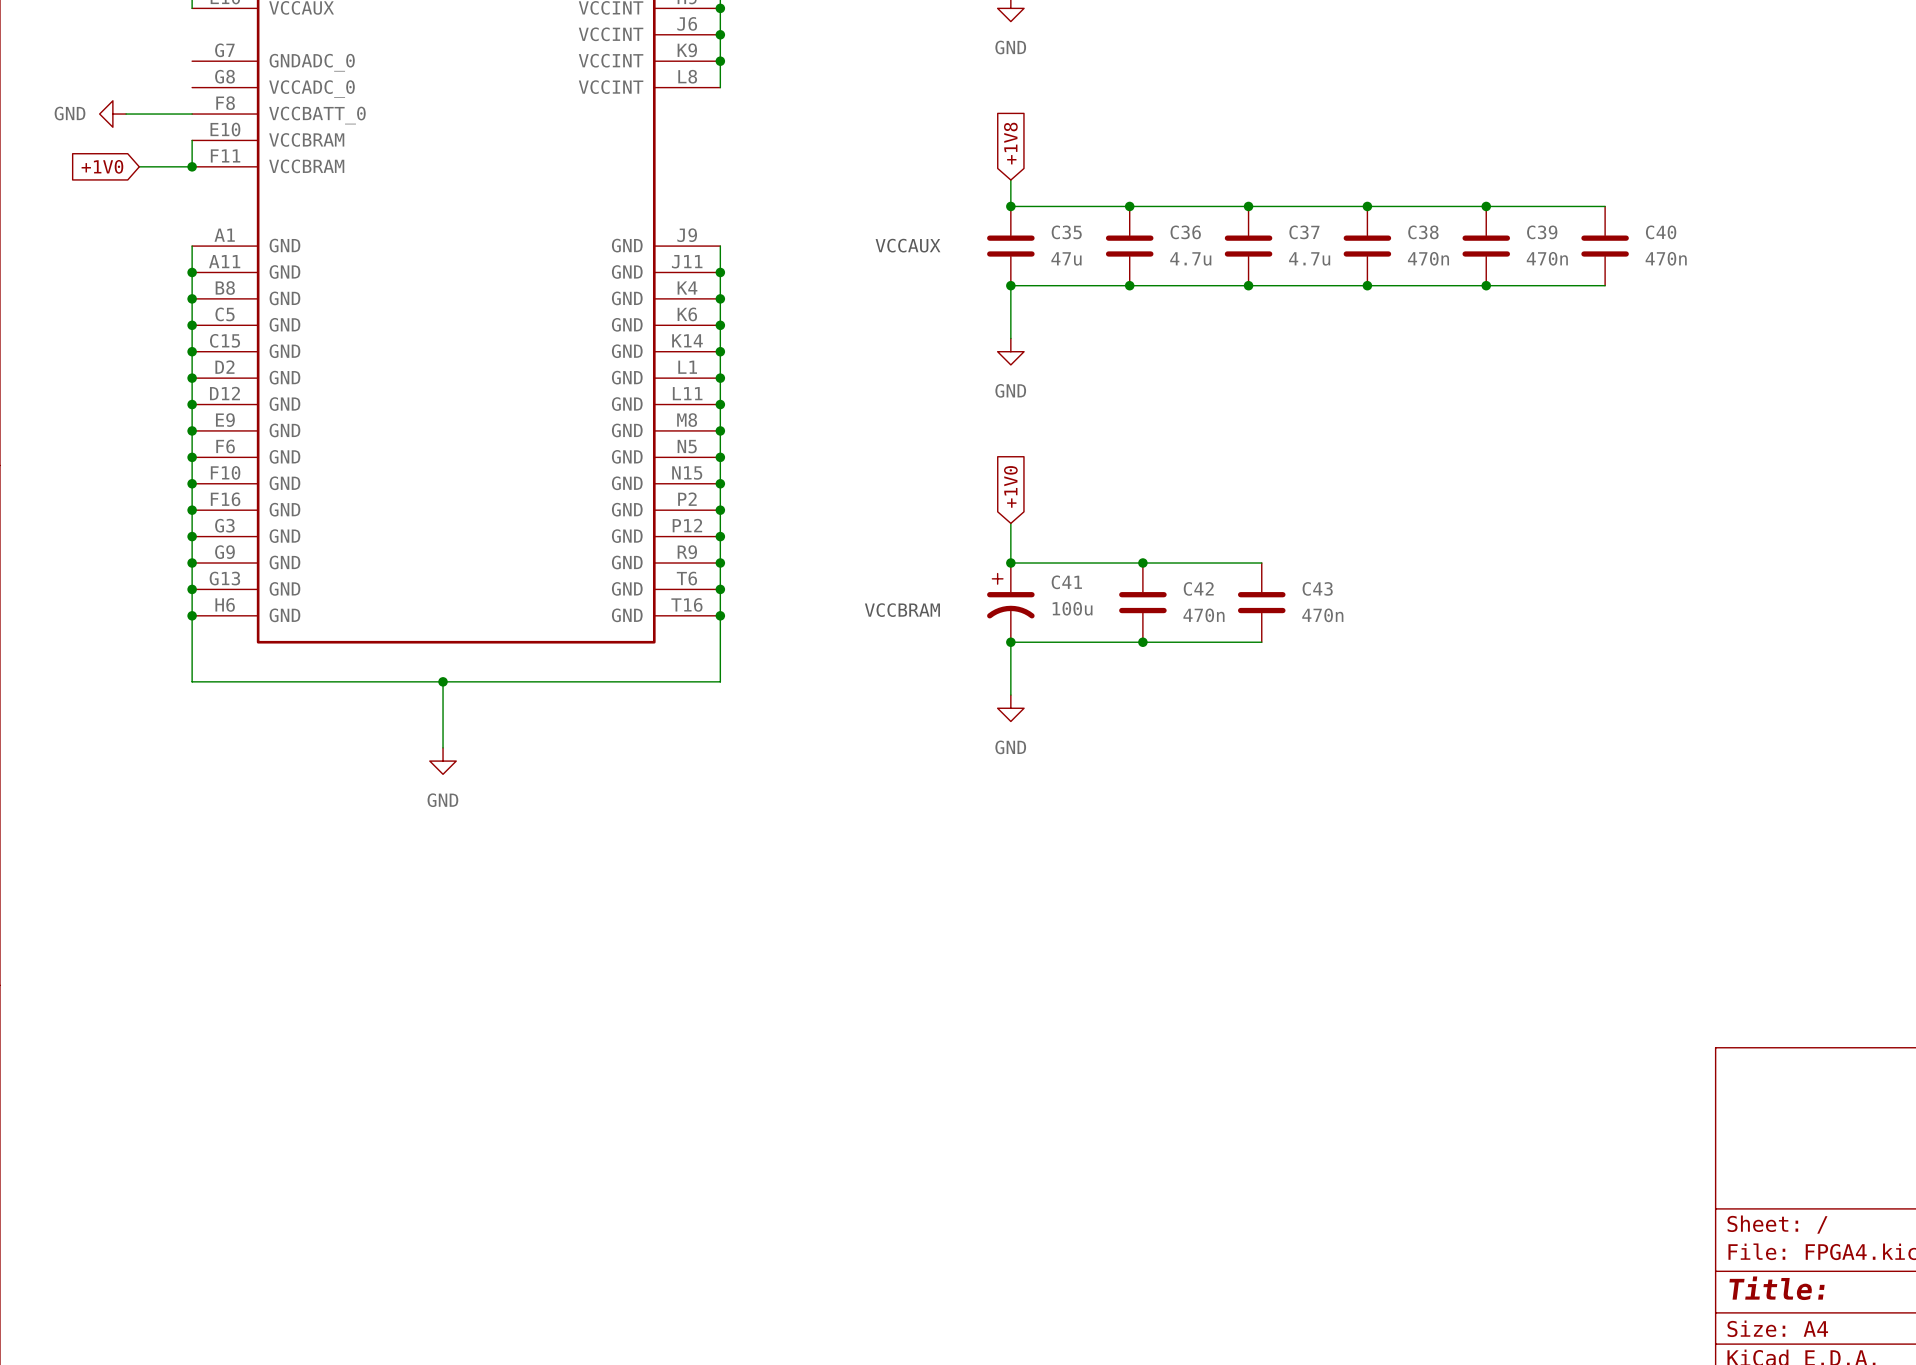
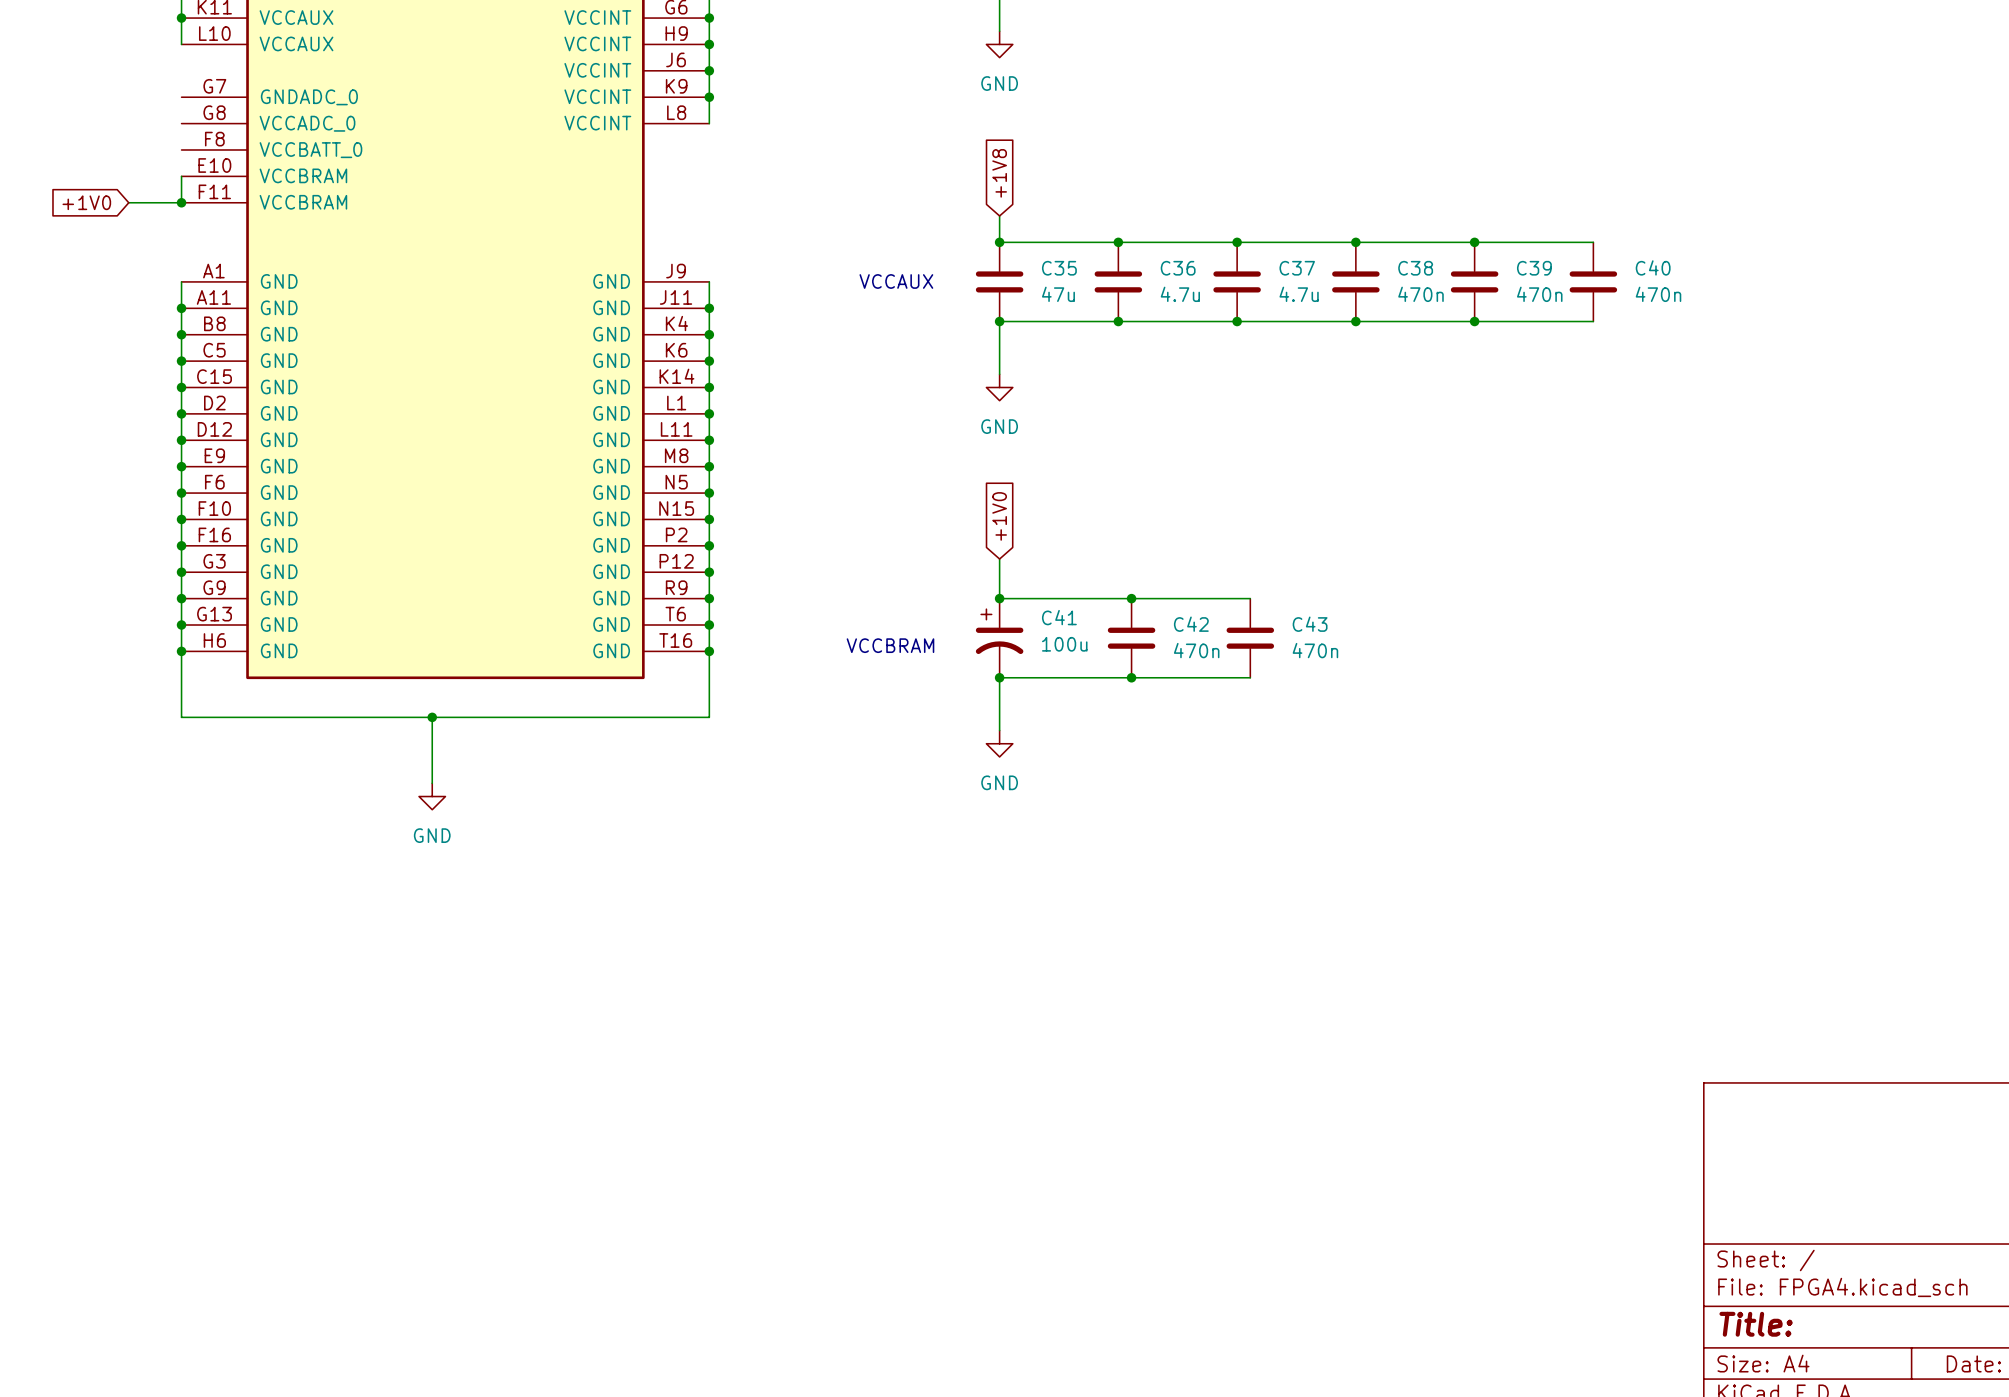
power symbol: GND (112, 114) -> none
wire: (126, 114) (192, 114) -> none

